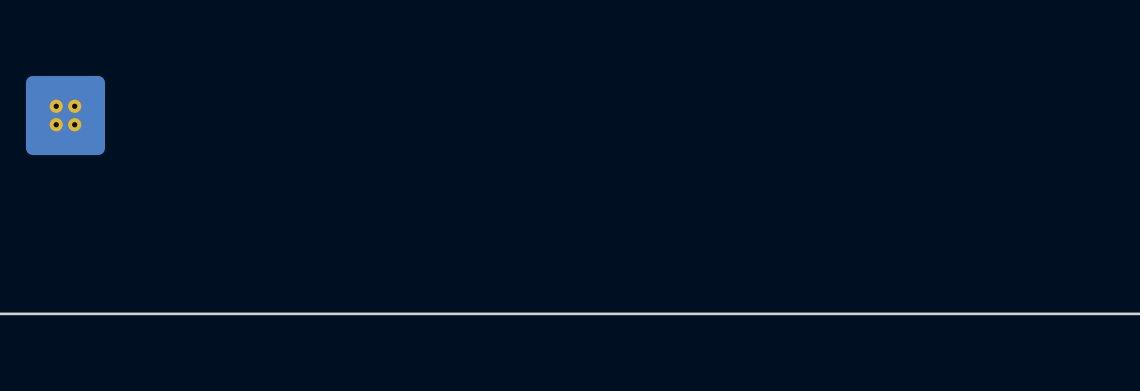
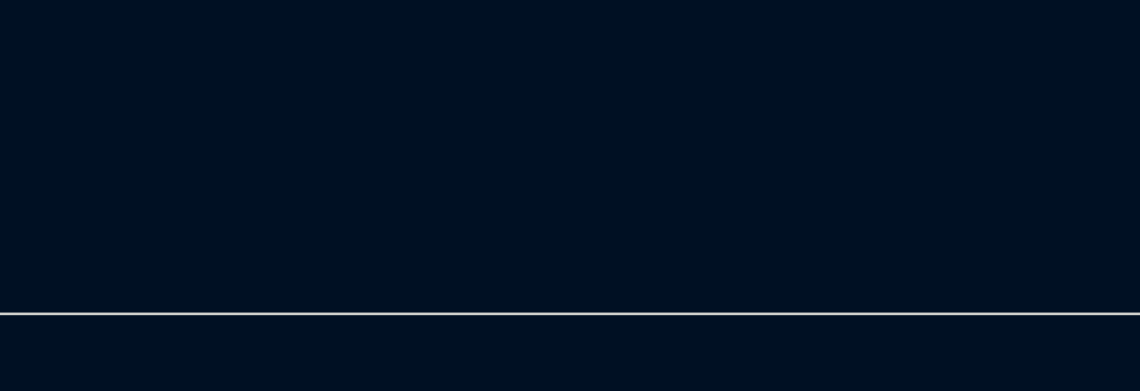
part: (65, 115) -> none

